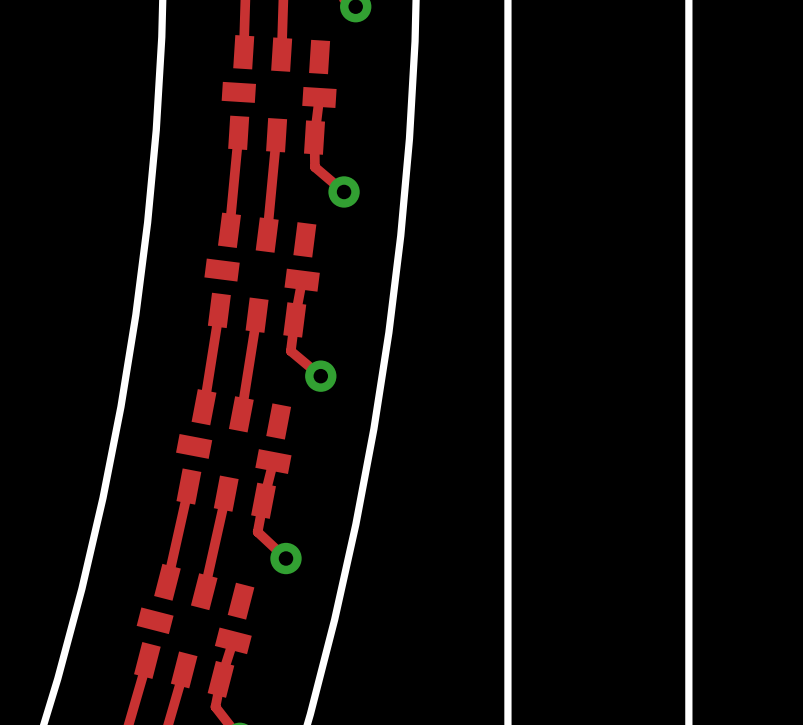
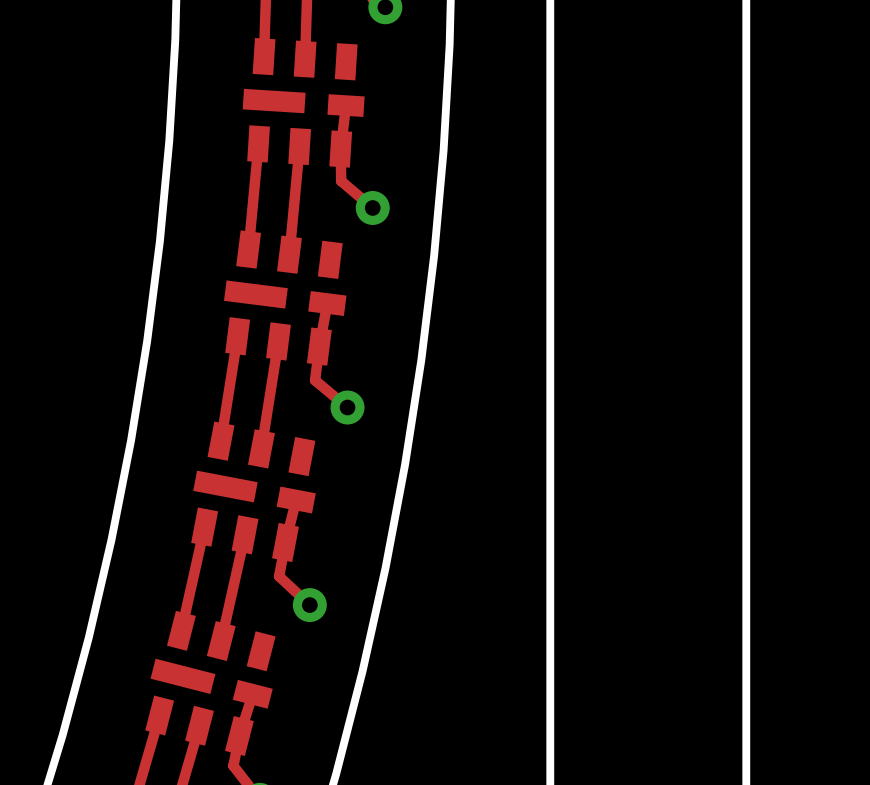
part footprint: [221, 35, 337, 155] -> [242, 37, 365, 168]
part footprint: [204, 212, 320, 338] -> [223, 230, 347, 366]
part footprint: [176, 389, 292, 519] -> [191, 421, 316, 563]
part footprint: [134, 563, 255, 698] -> [145, 610, 276, 756]

